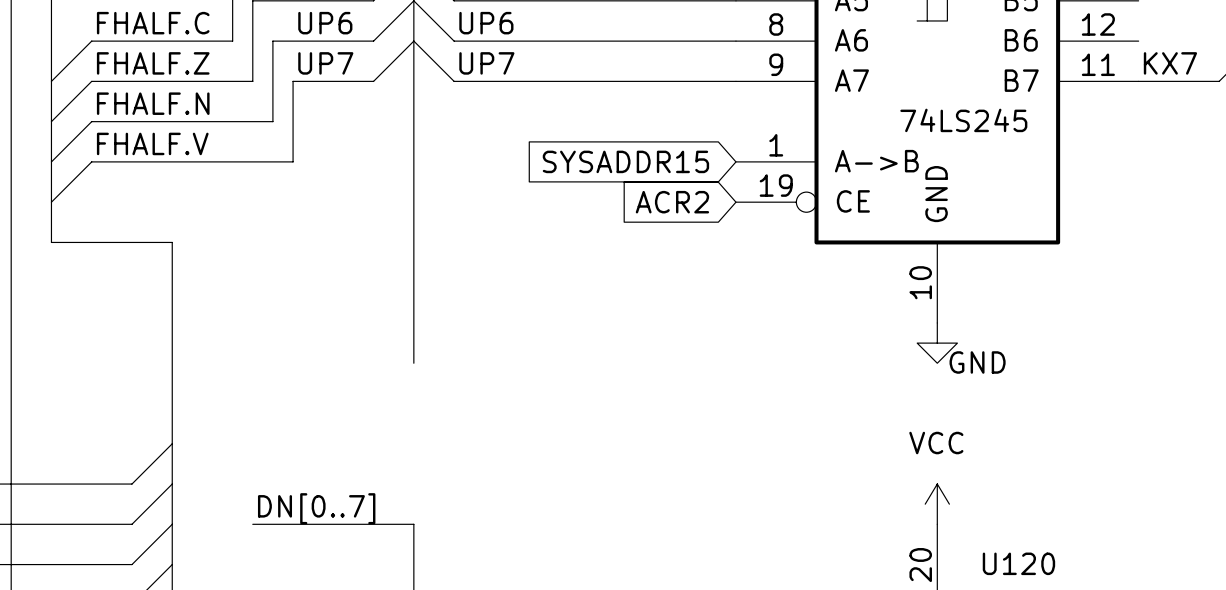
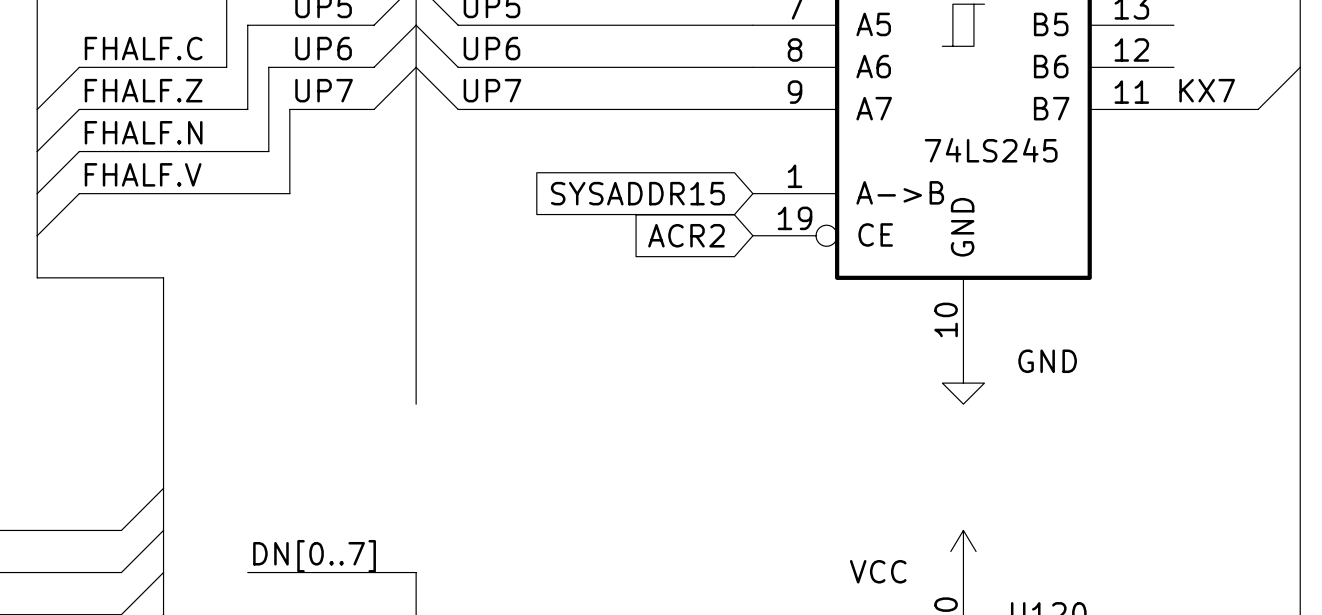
power symbol text position: GND (977, 362) -> GND (1047, 361)
power symbol text position: VCC (936, 443) -> VCC (878, 571)

